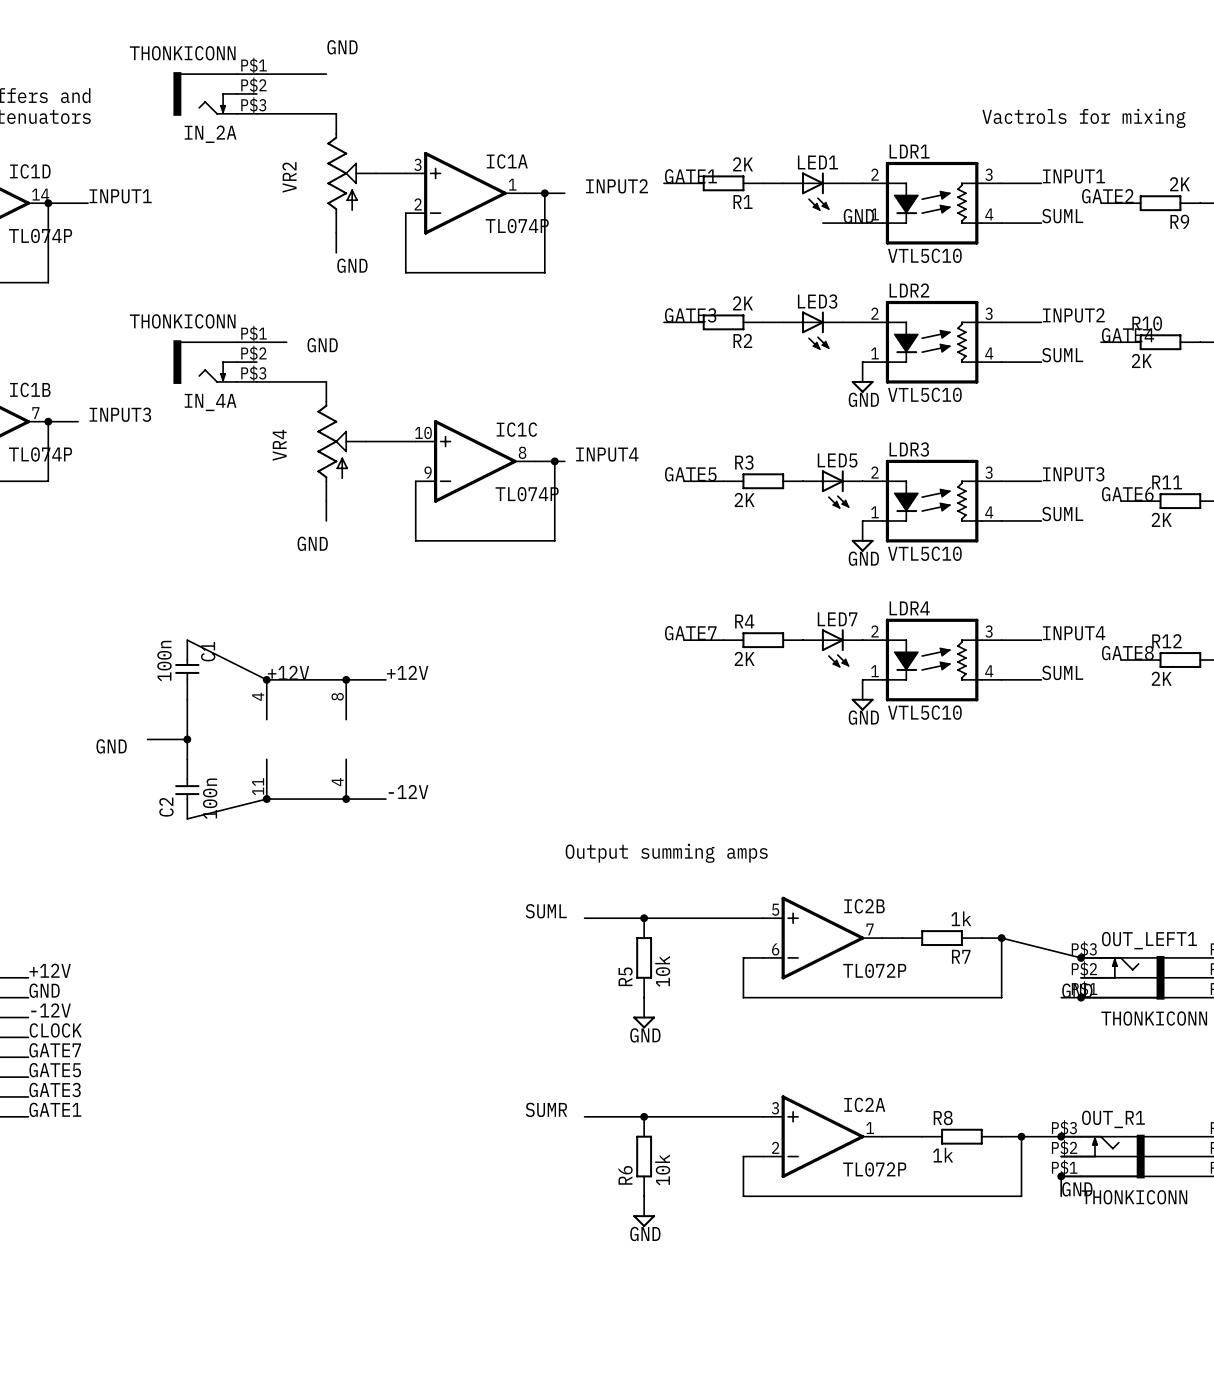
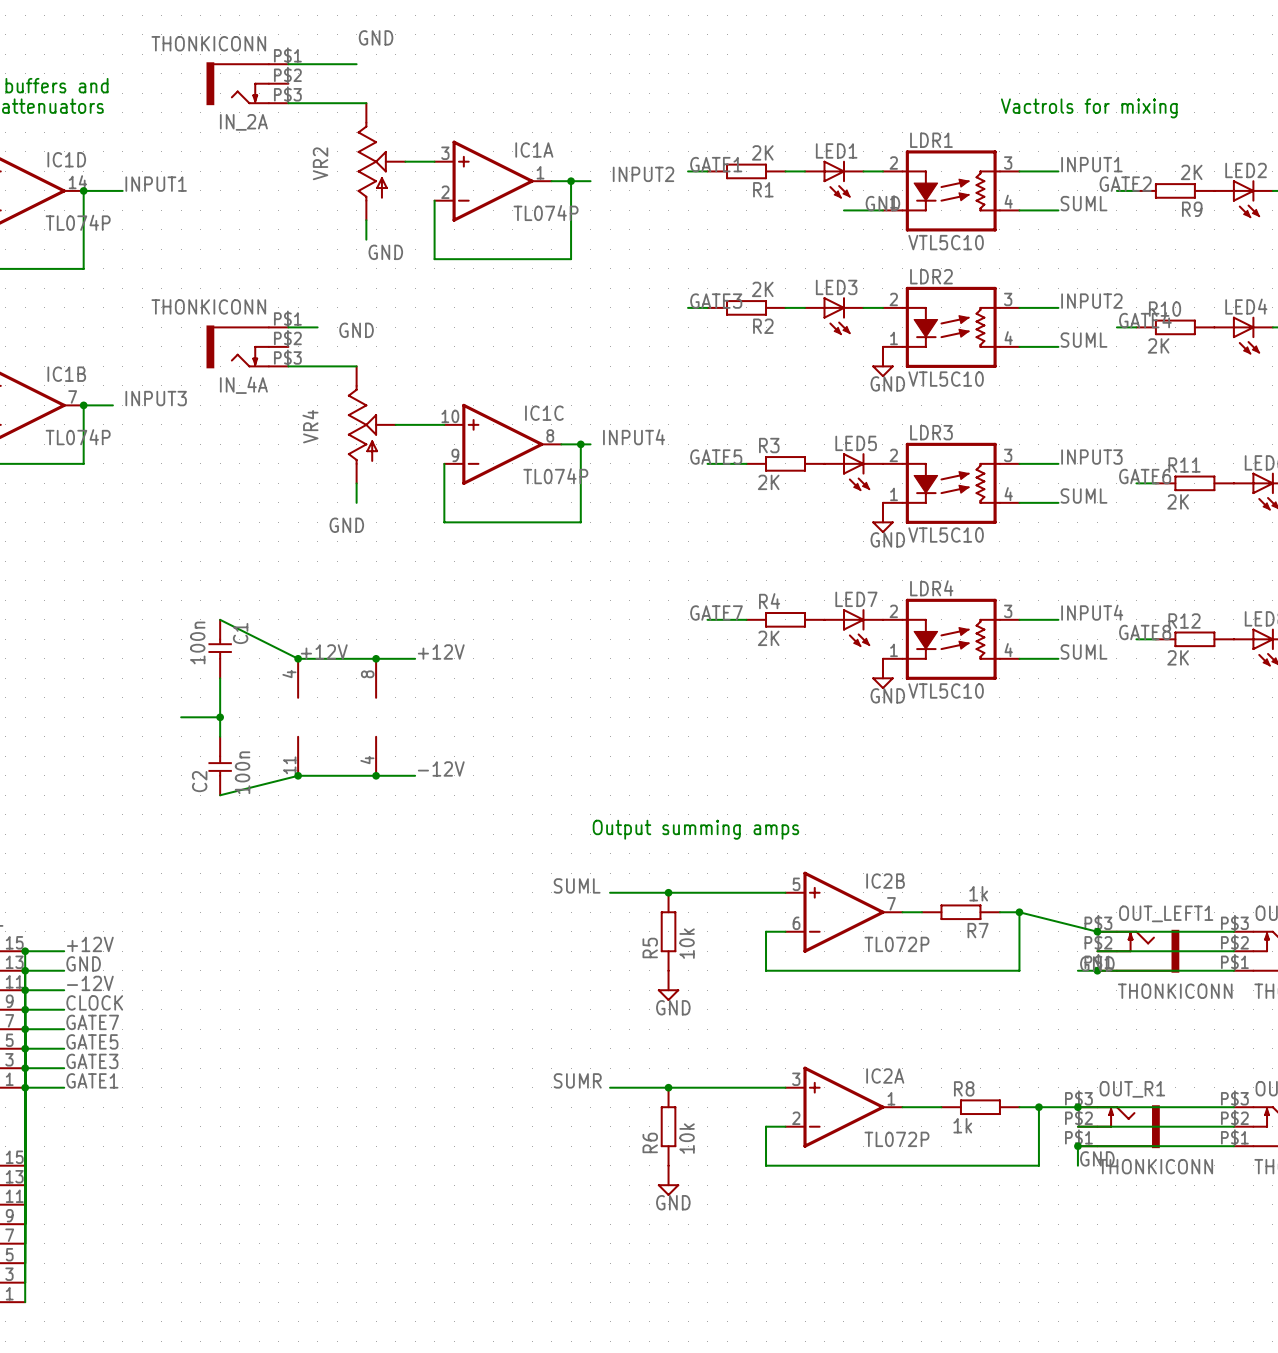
label: GND (111, 746) -> none

